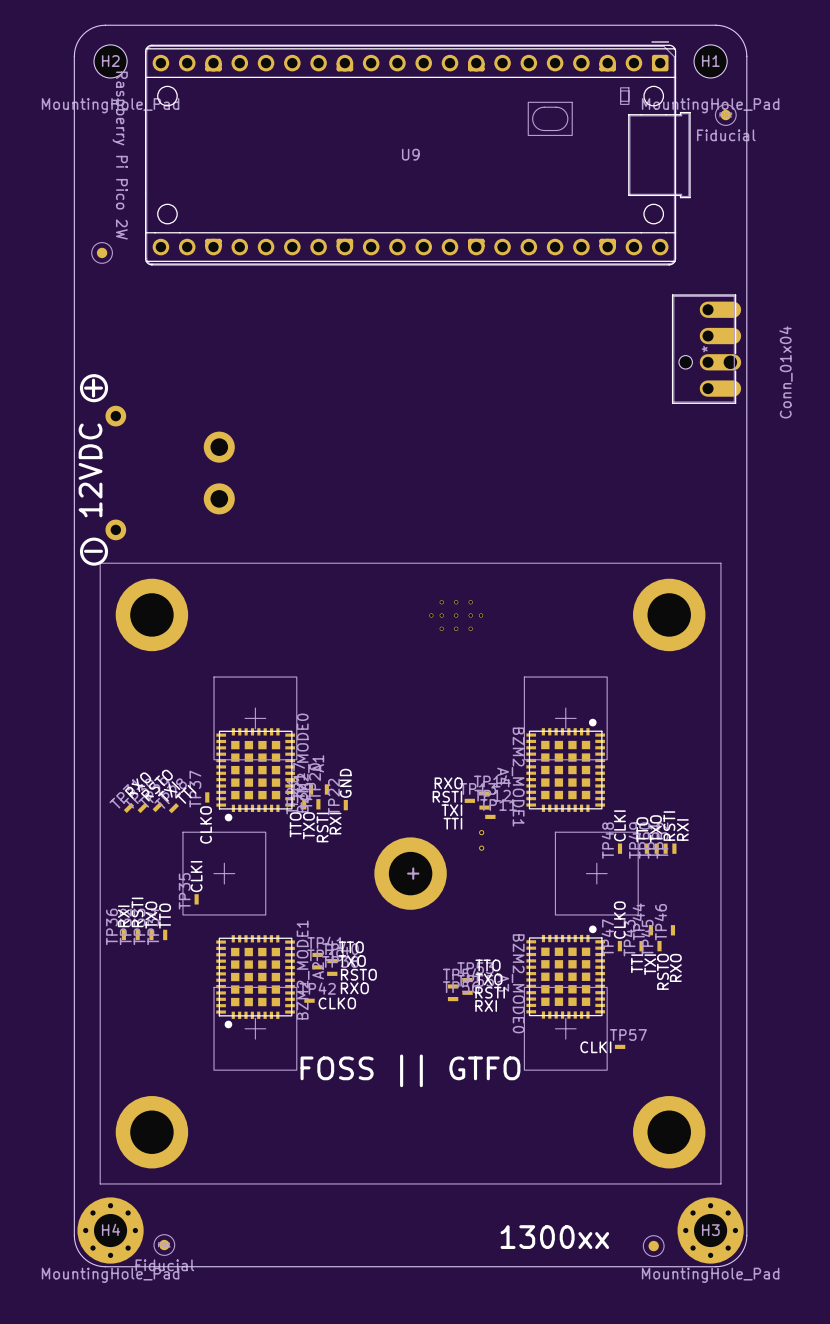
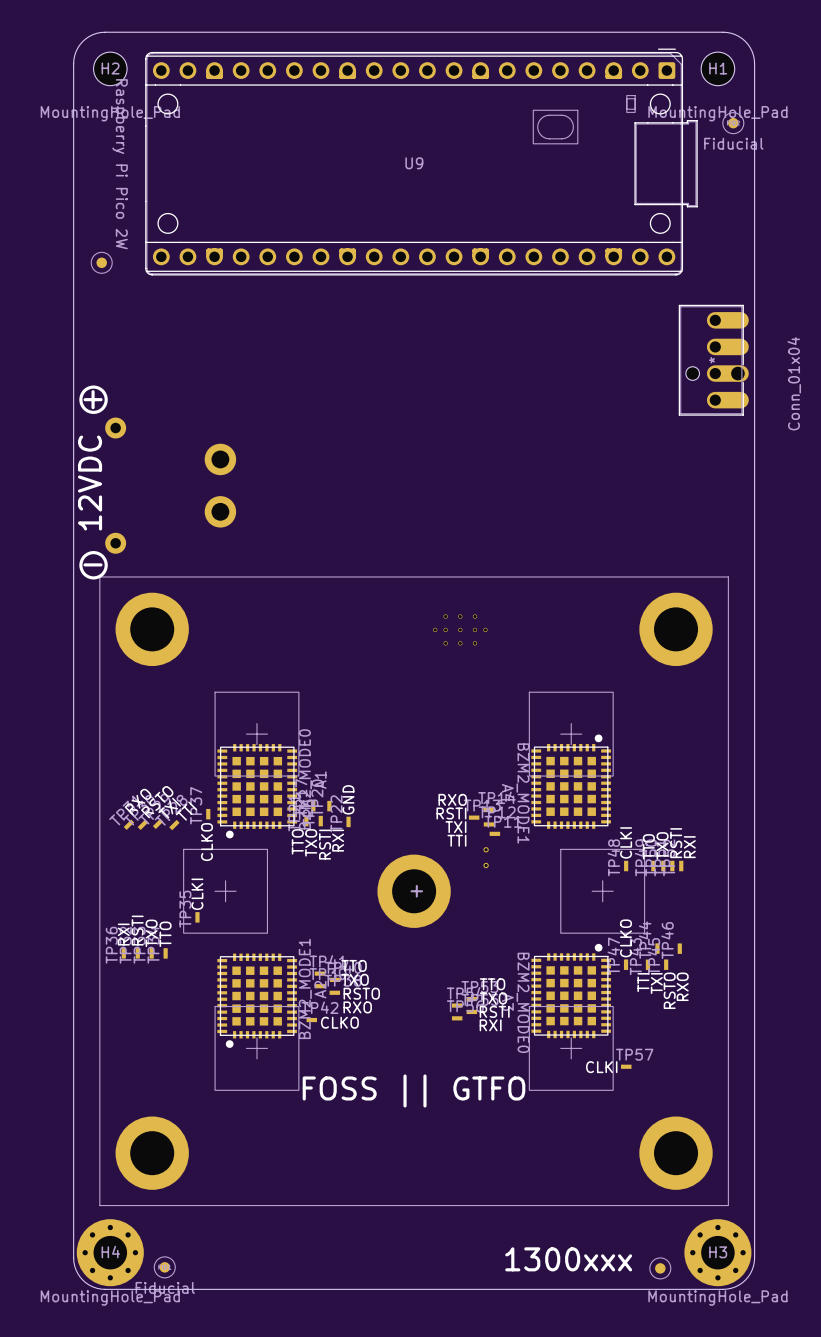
text: 1300xx (554, 1237) -> 1300xxx (568, 1259)

